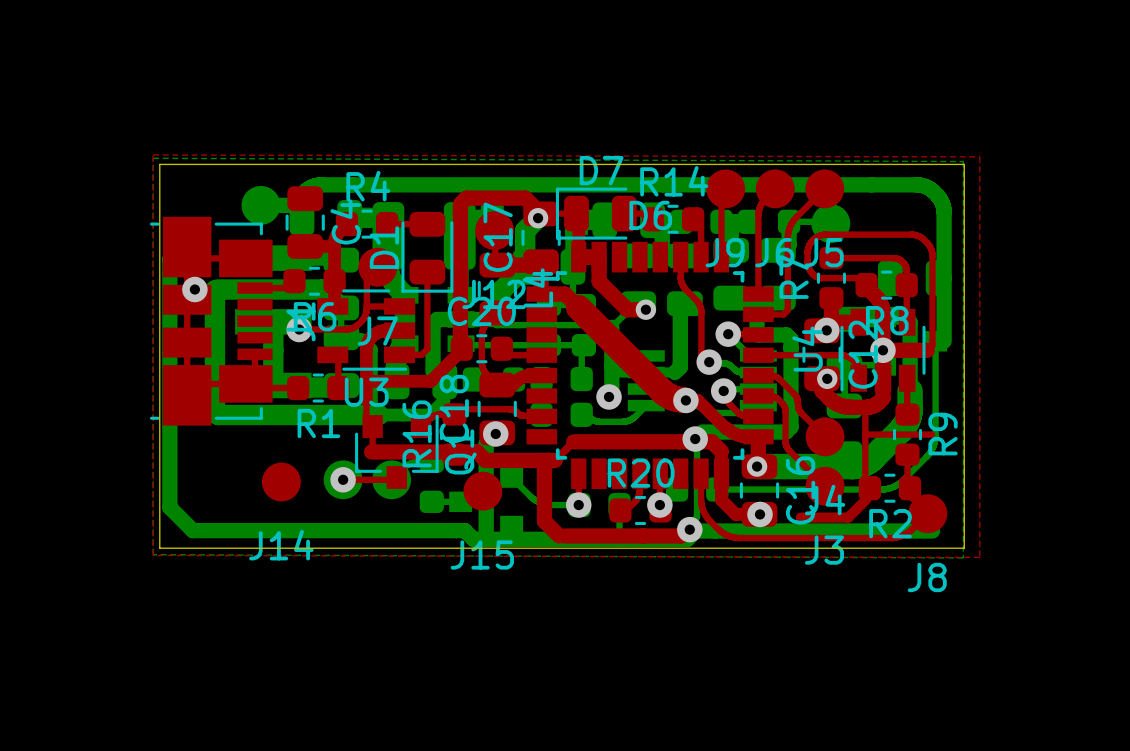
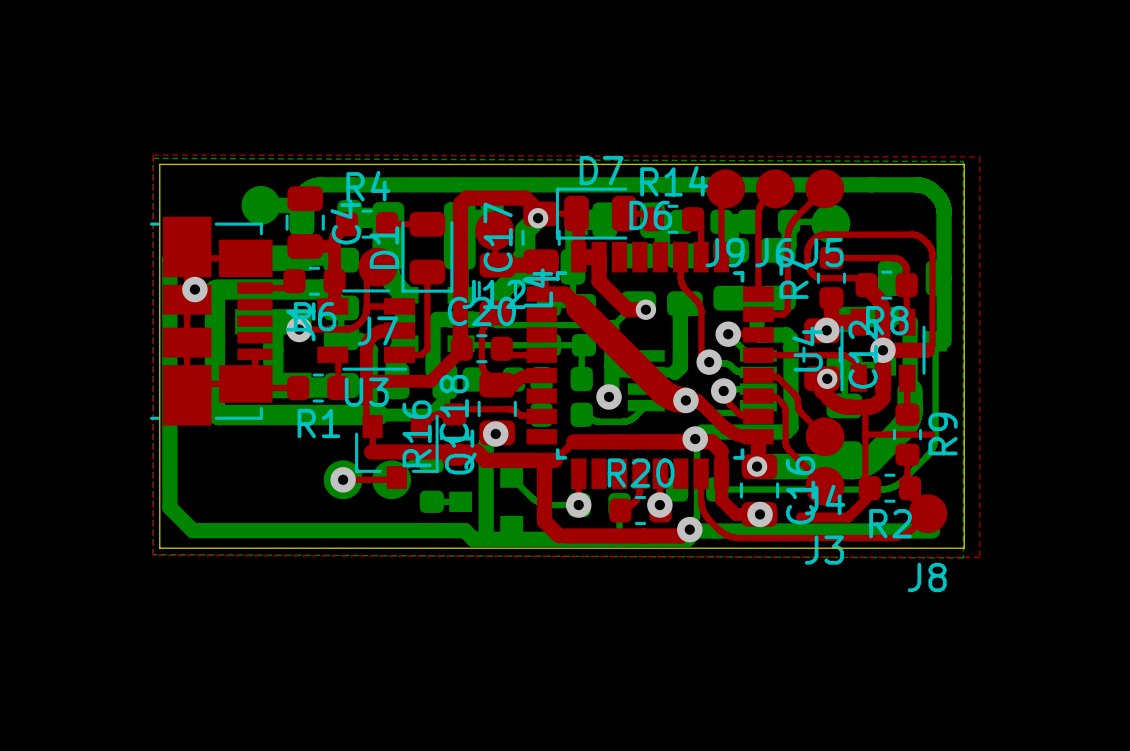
J14: (281, 482) -> none
J15: (482, 491) -> none

